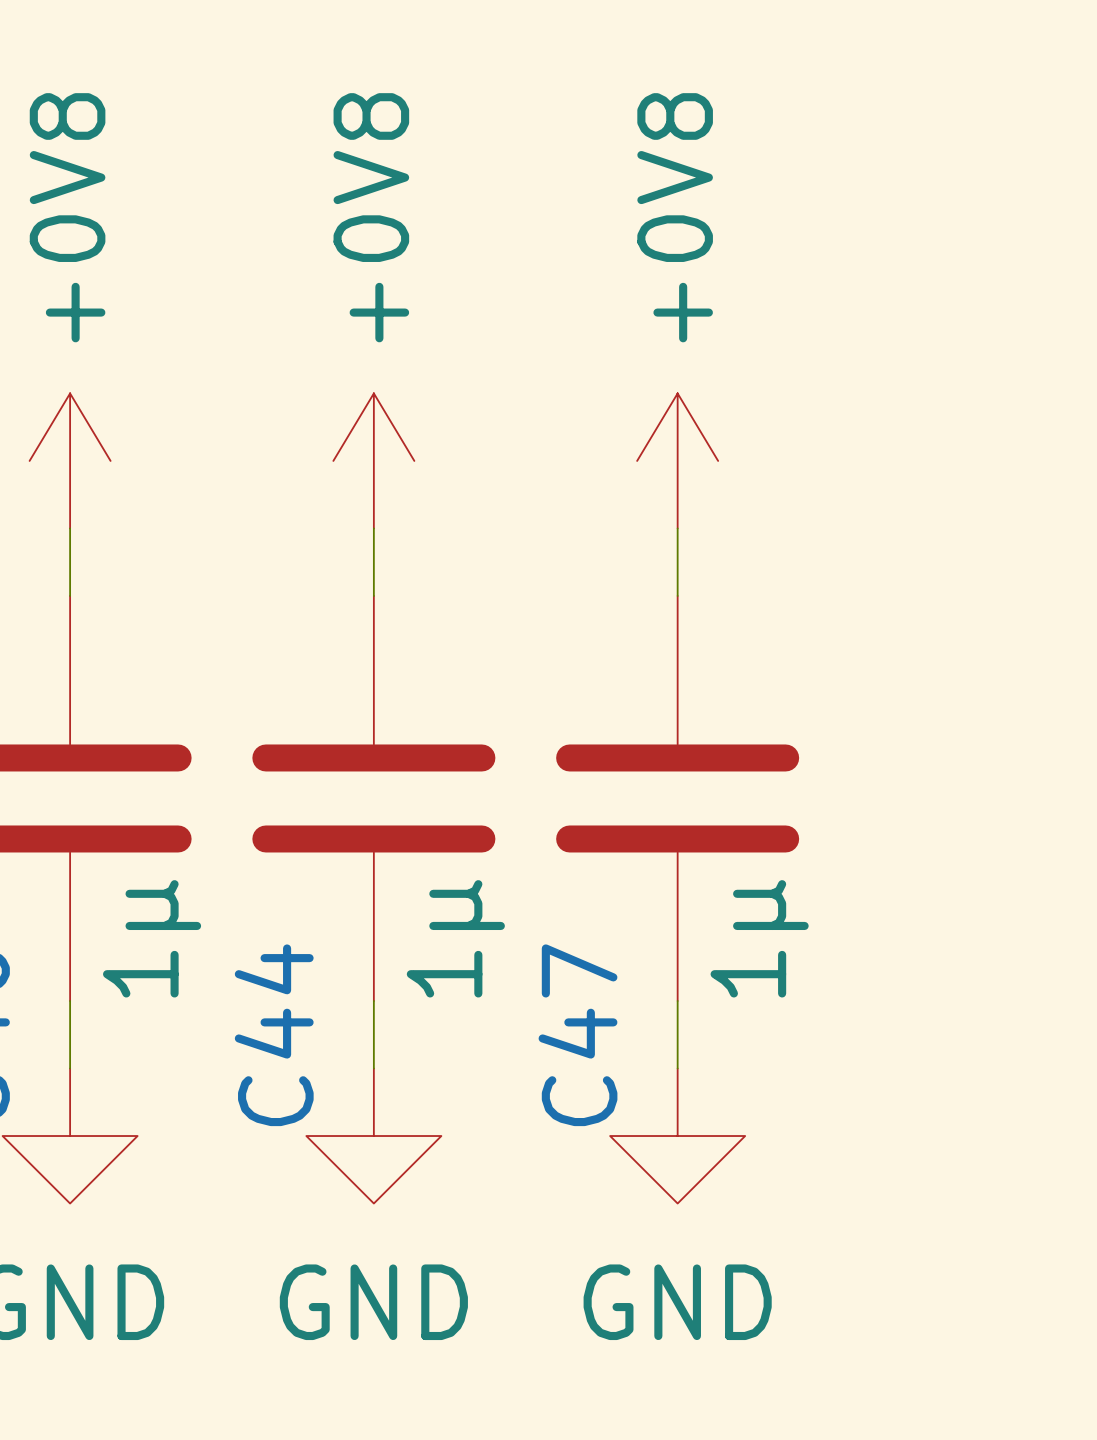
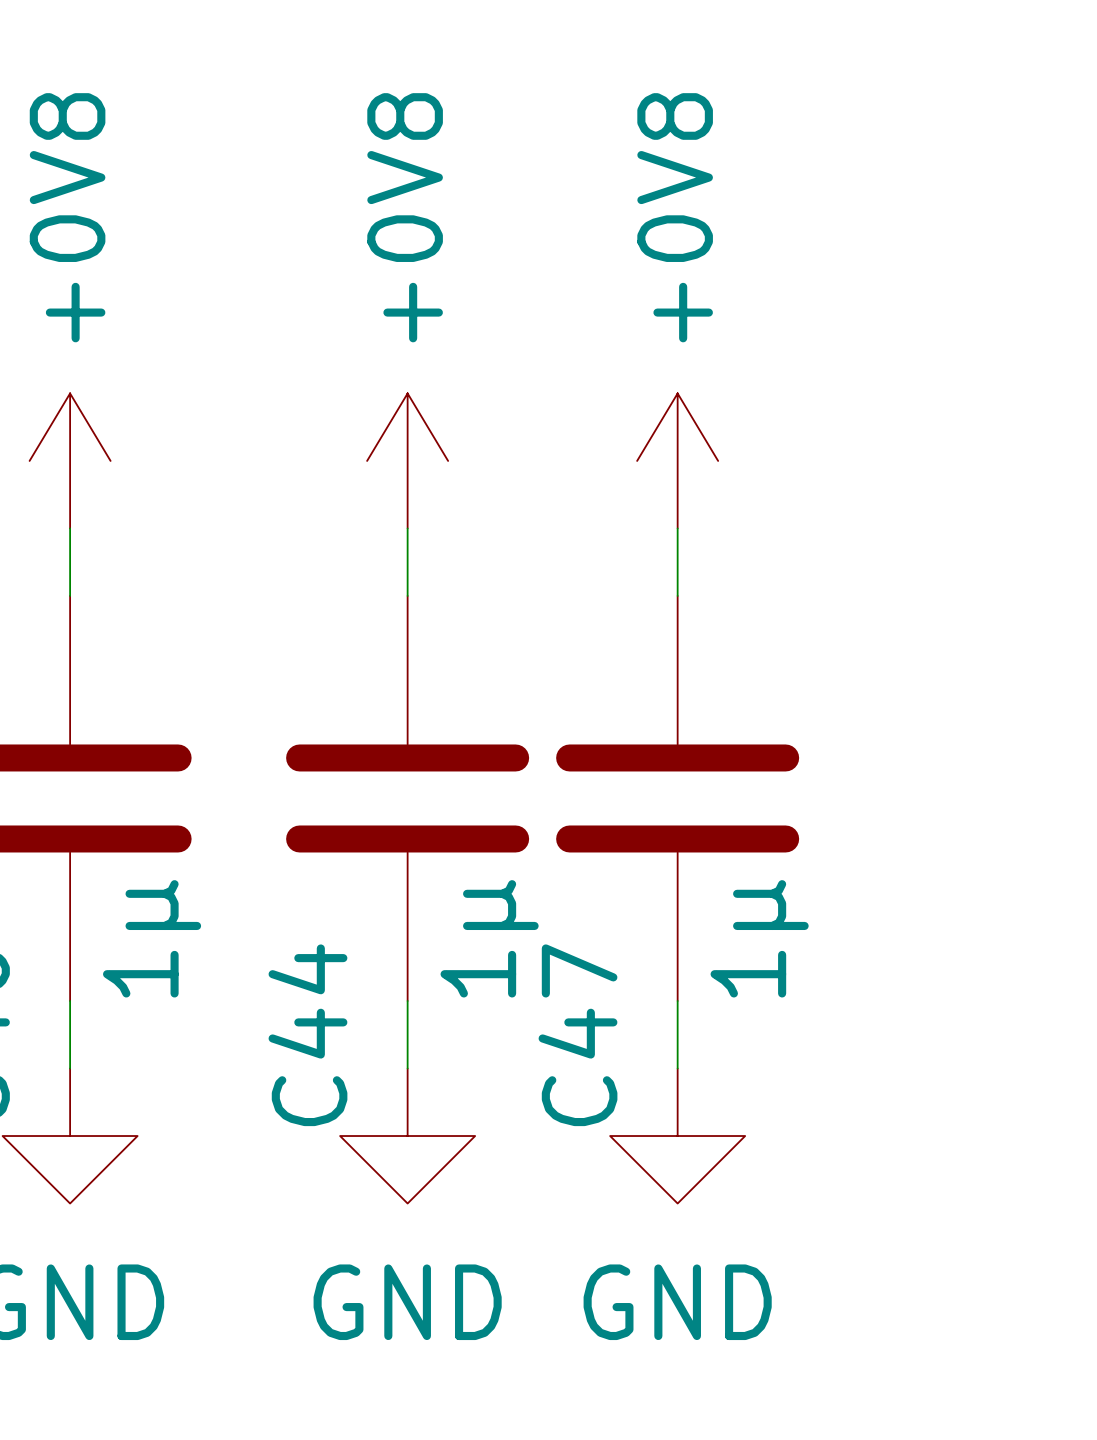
part position: (373, 460) -> (407, 460)
wire: (373, 528) (373, 595) -> (407, 528) (407, 595)
C44 position: (373, 798) -> (407, 798)
wire: (373, 1001) (373, 1068) -> (407, 1001) (407, 1068)
power symbol position: GND (373, 1136) -> GND (407, 1136)

